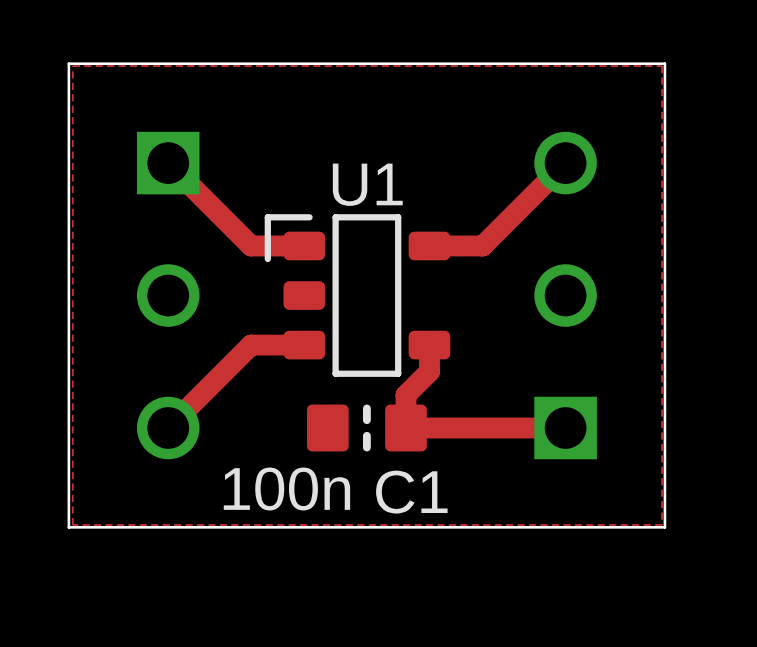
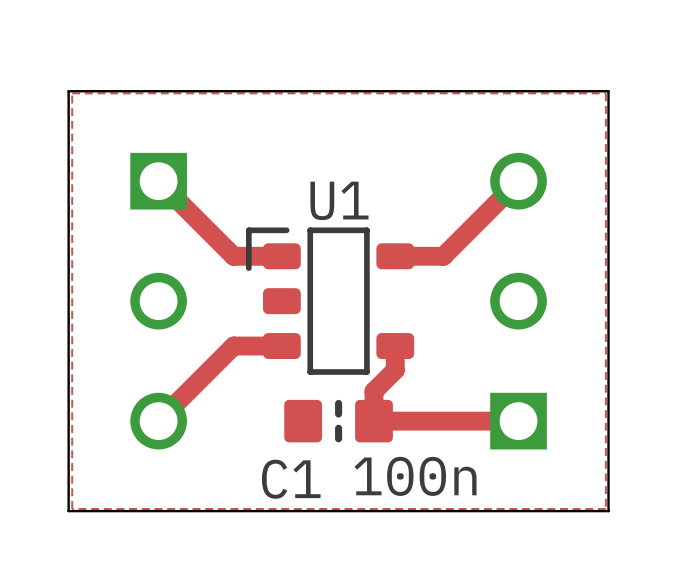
C1 value position: 100n (286, 488) -> 100n (415, 476)
C1 name position: C1 (411, 492) -> C1 (291, 479)

